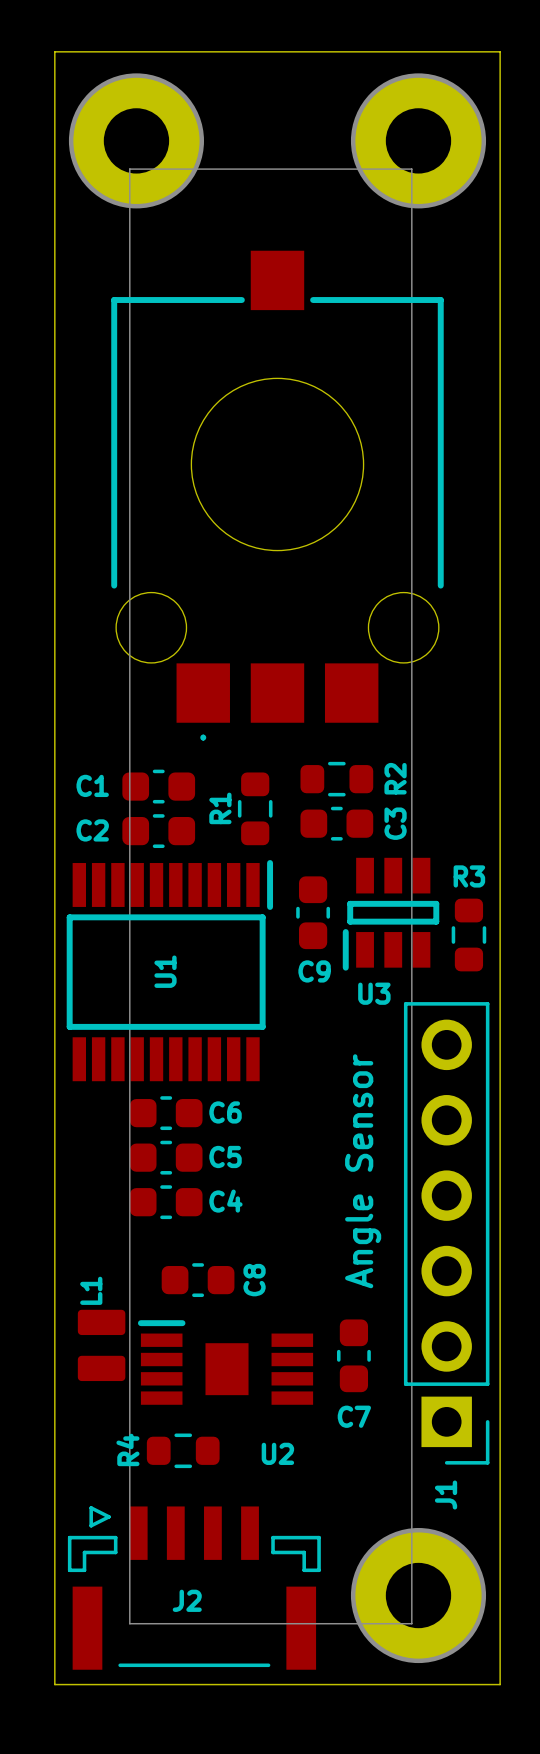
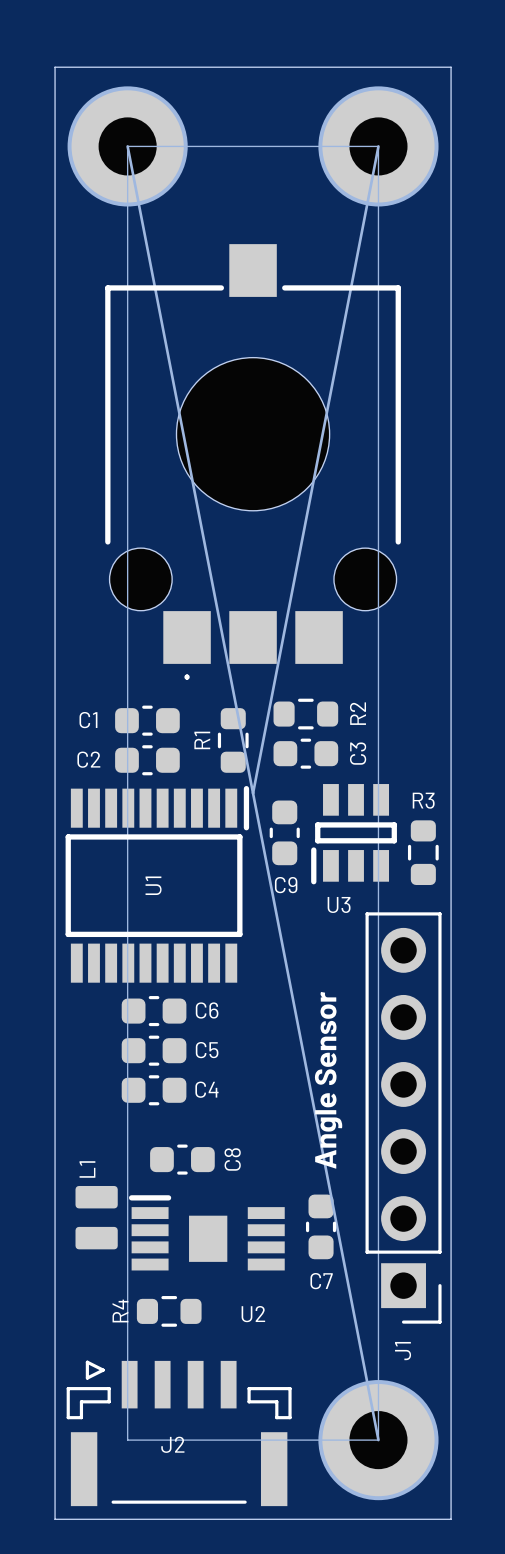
line: none -> (127, 146) (378, 146)
line: none -> (127, 146) (127, 1440) (378, 1440)
line: none -> (127, 146) (378, 1440)
line: none -> (378, 146) (378, 1440)
line: none -> (378, 146) (253, 793)
line: (129, 169) (411, 169) (411, 1623) (129, 1623) (129, 169) -> none

